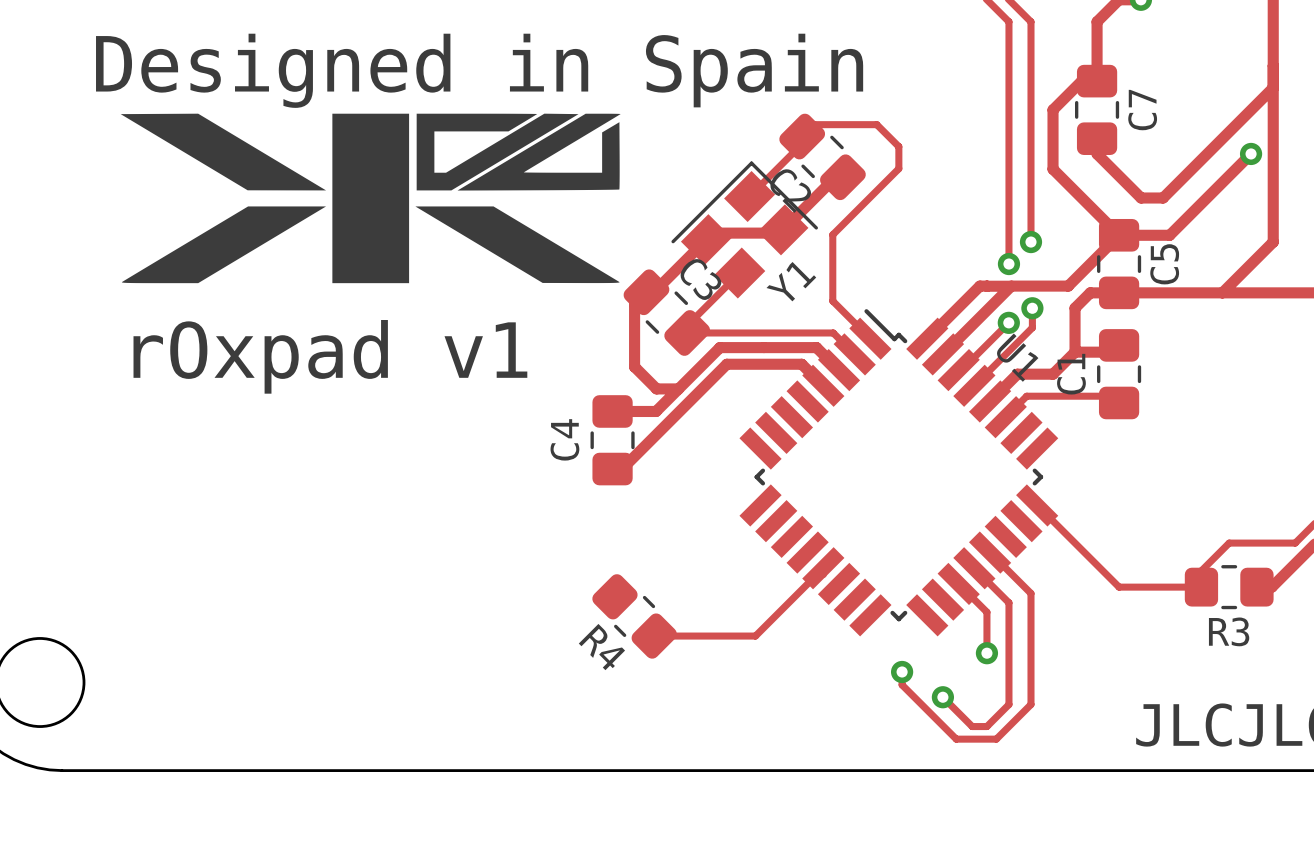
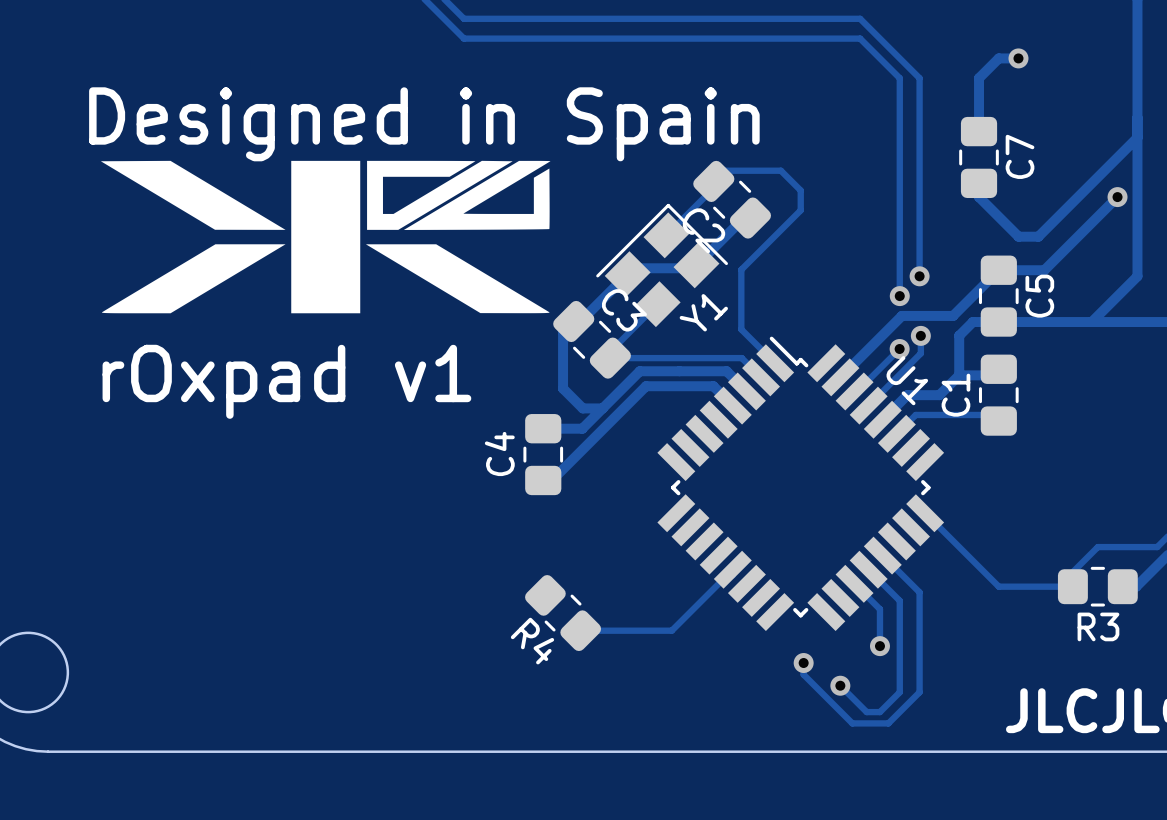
track: (1097, 81) (1081, 81) (1053, 109) (1053, 169) (1119, 235) -> none
track: (1008, 286) (979, 286) (927, 338) -> none

